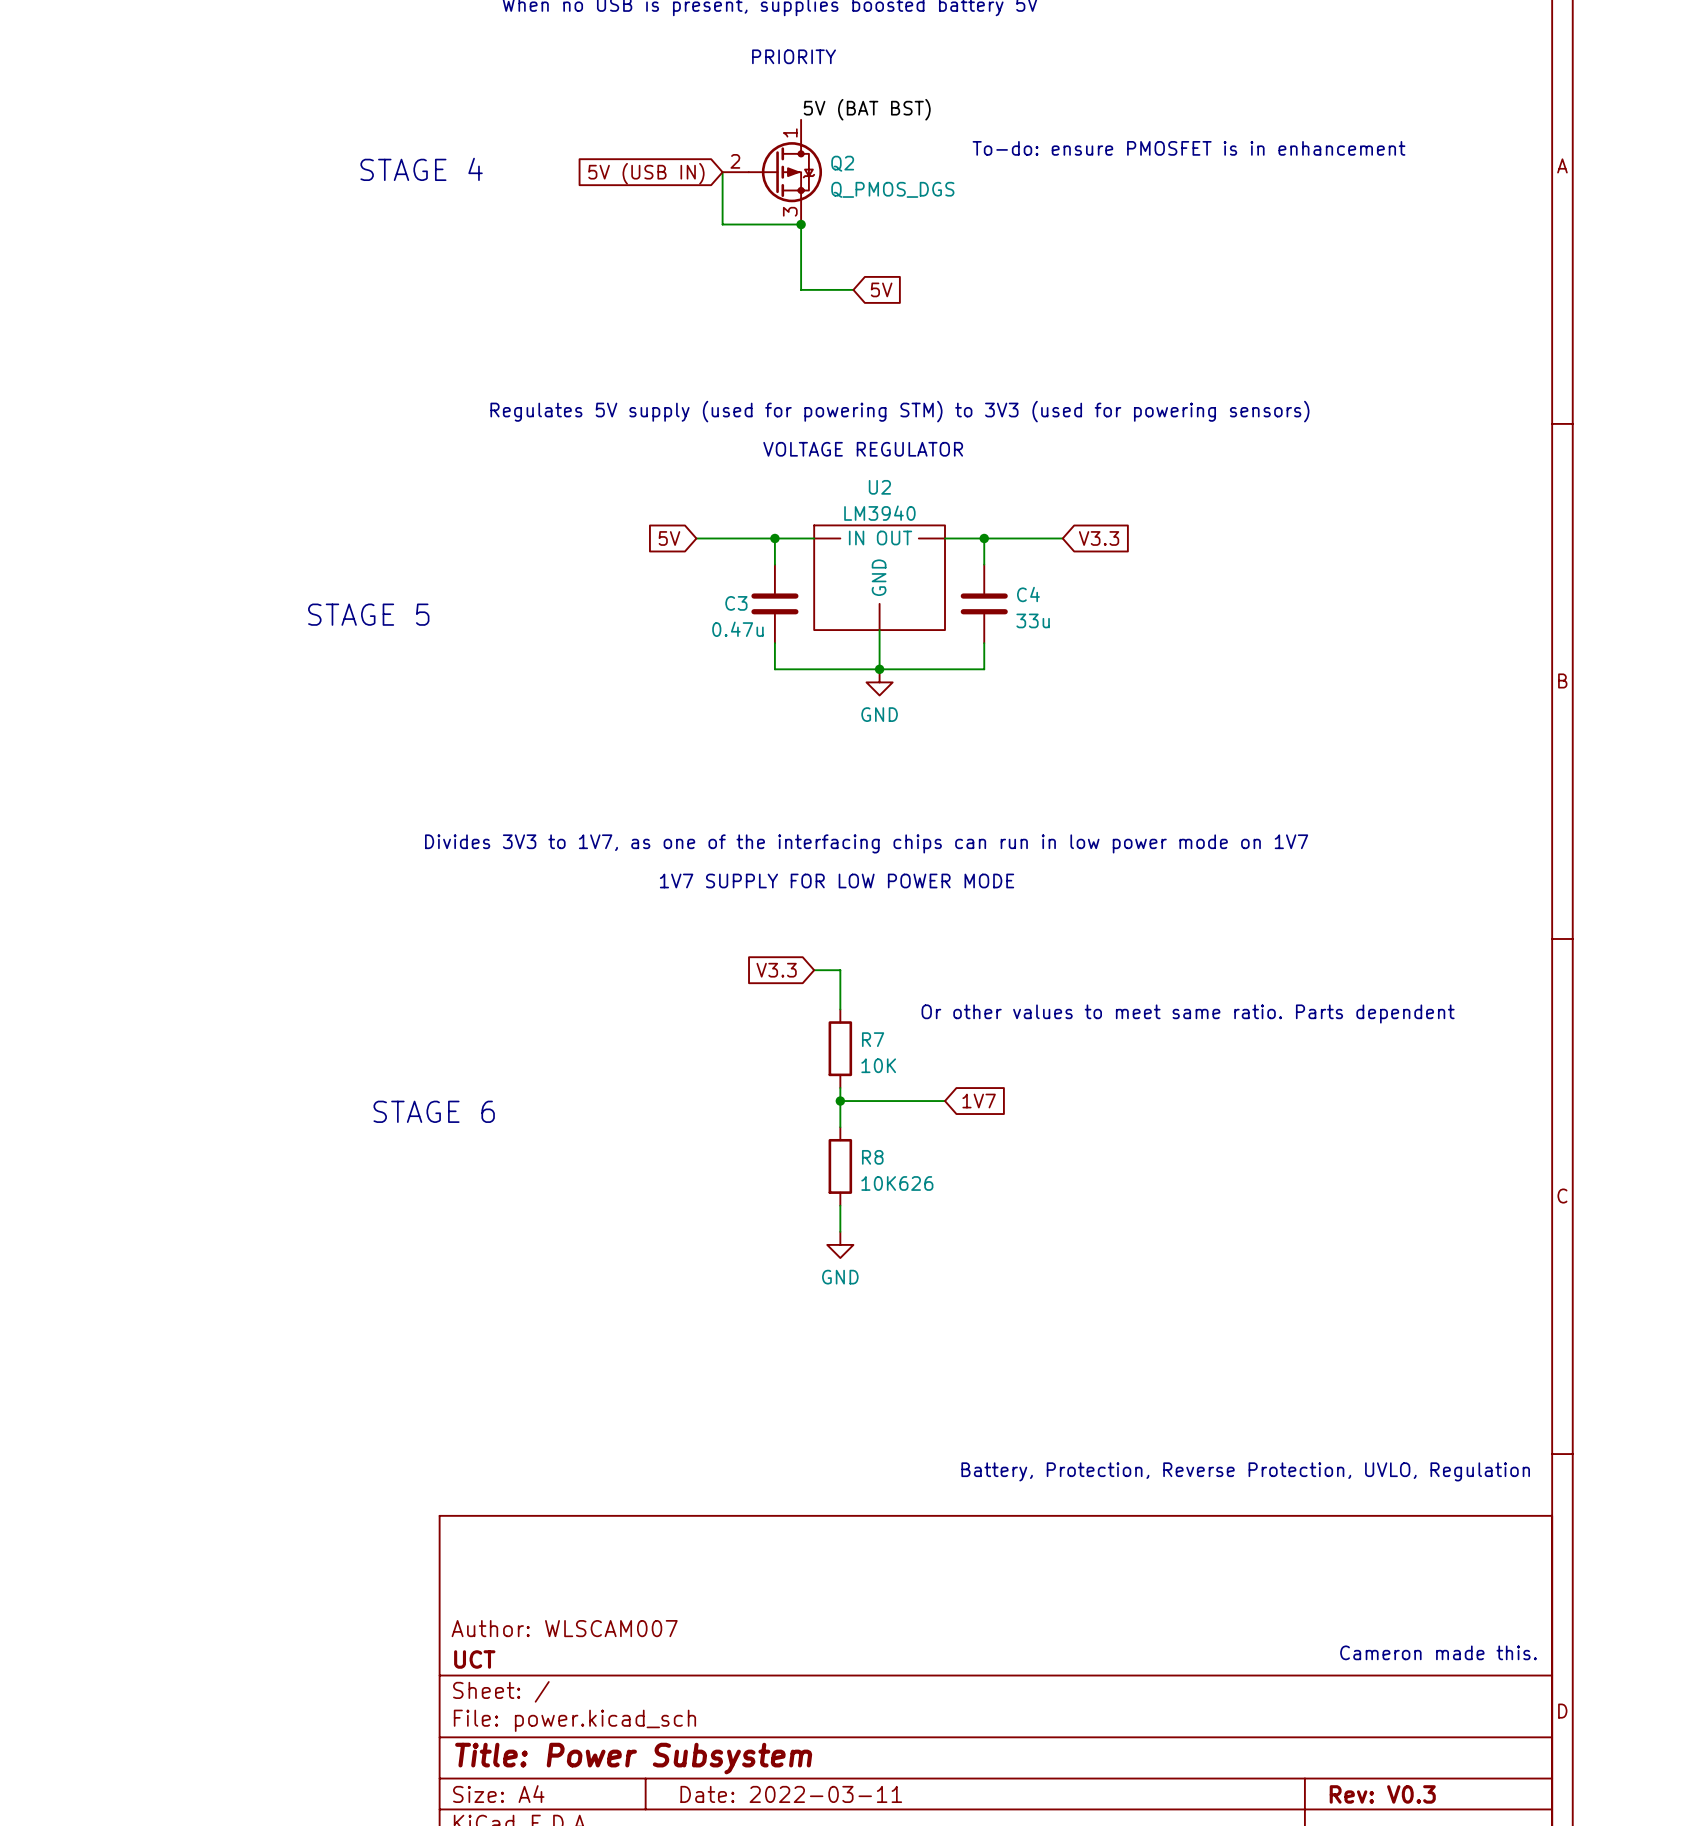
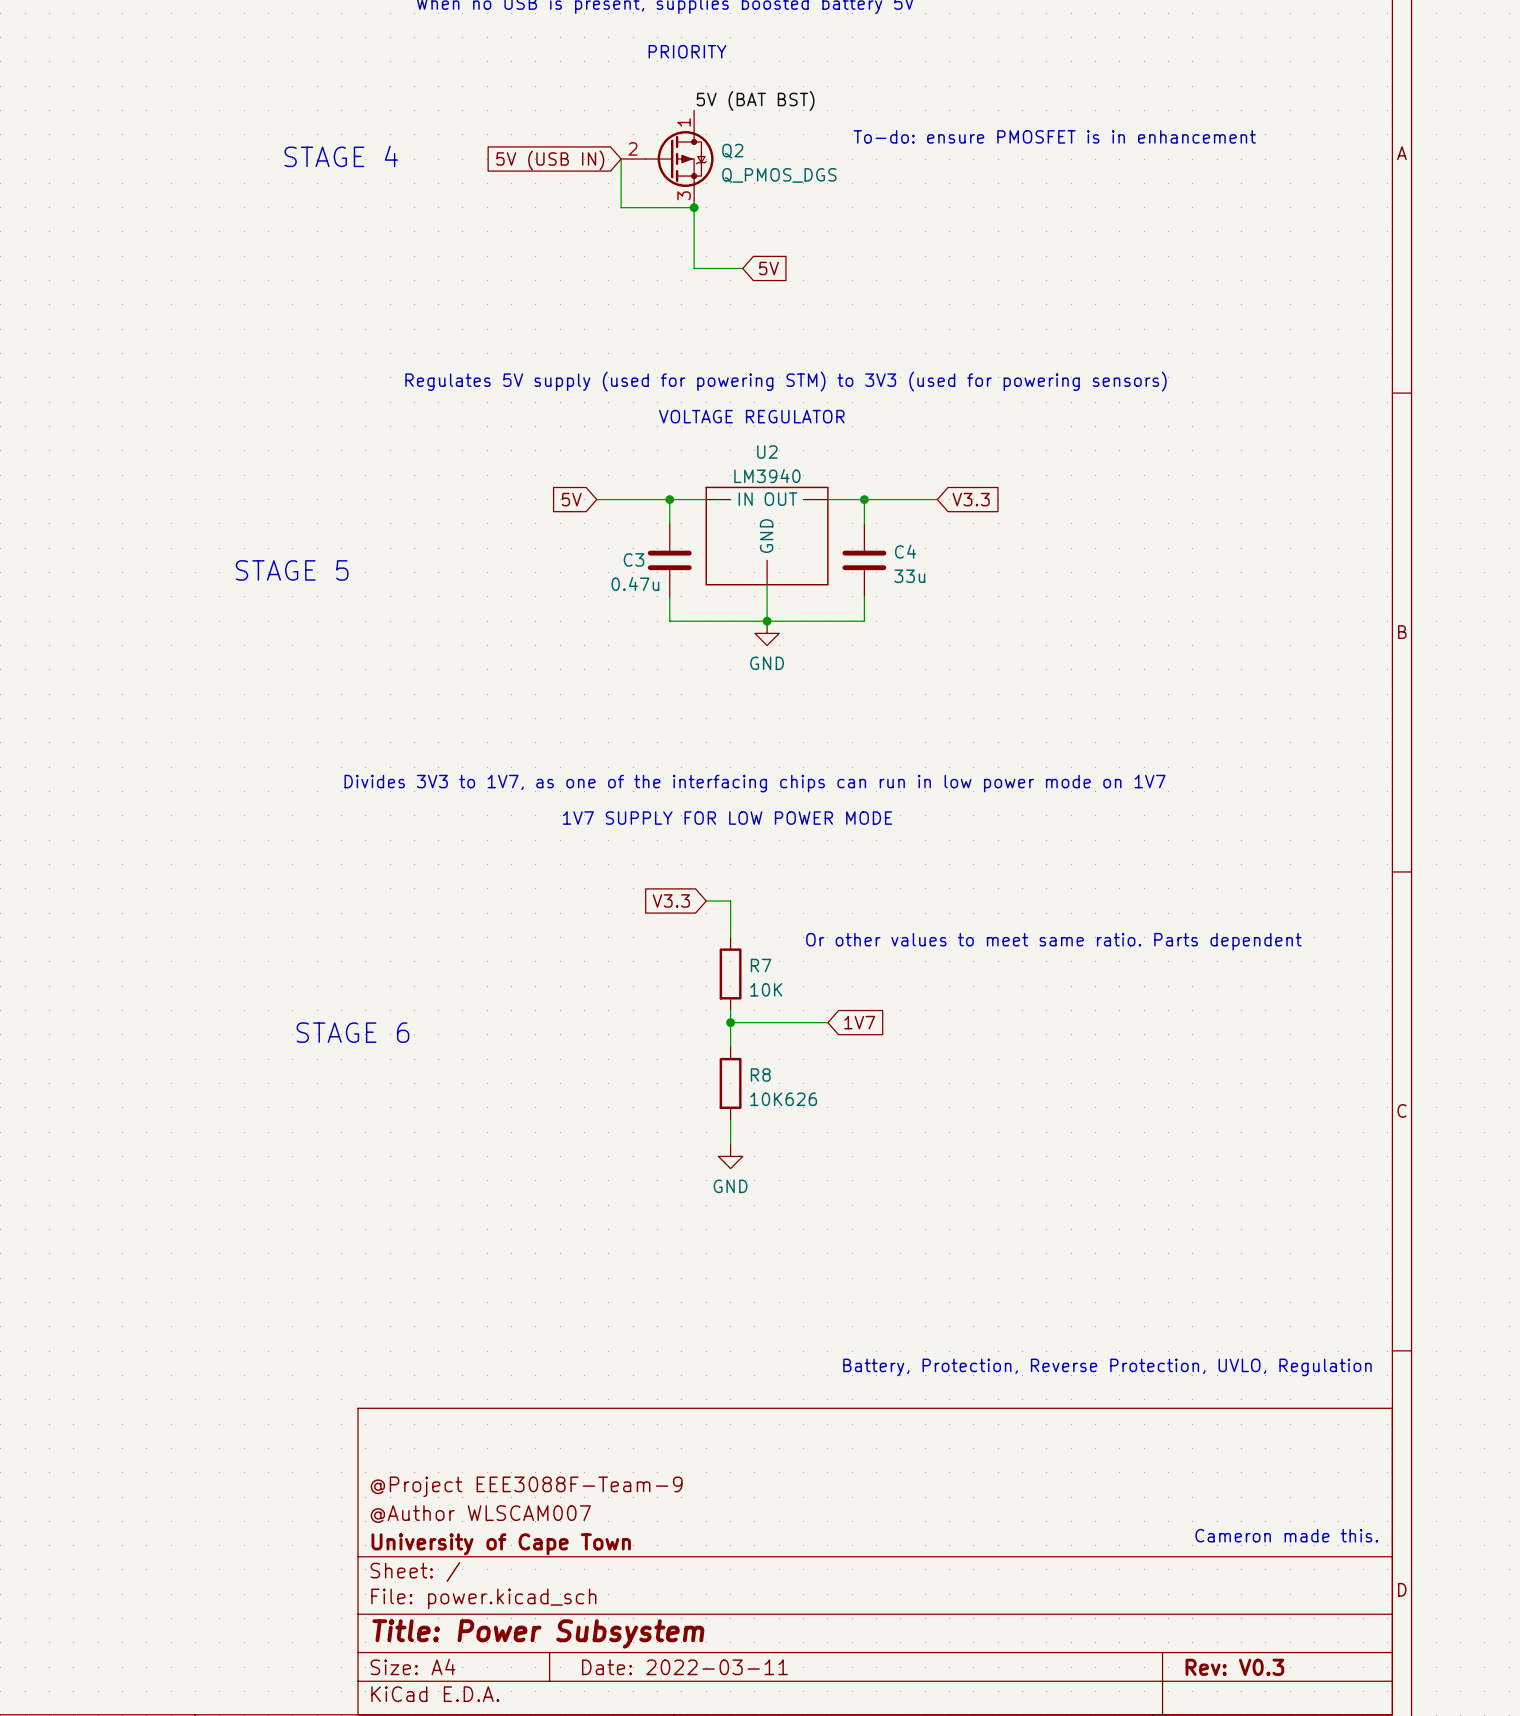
title block: none -> @Project EEE3088F-Team-9 (526, 1486)
title block: Author: WLSCAM007 (564, 1628) -> @Author WLSCAM007 (480, 1514)
title block: UCT (474, 1659) -> University of Cape Town (501, 1544)

